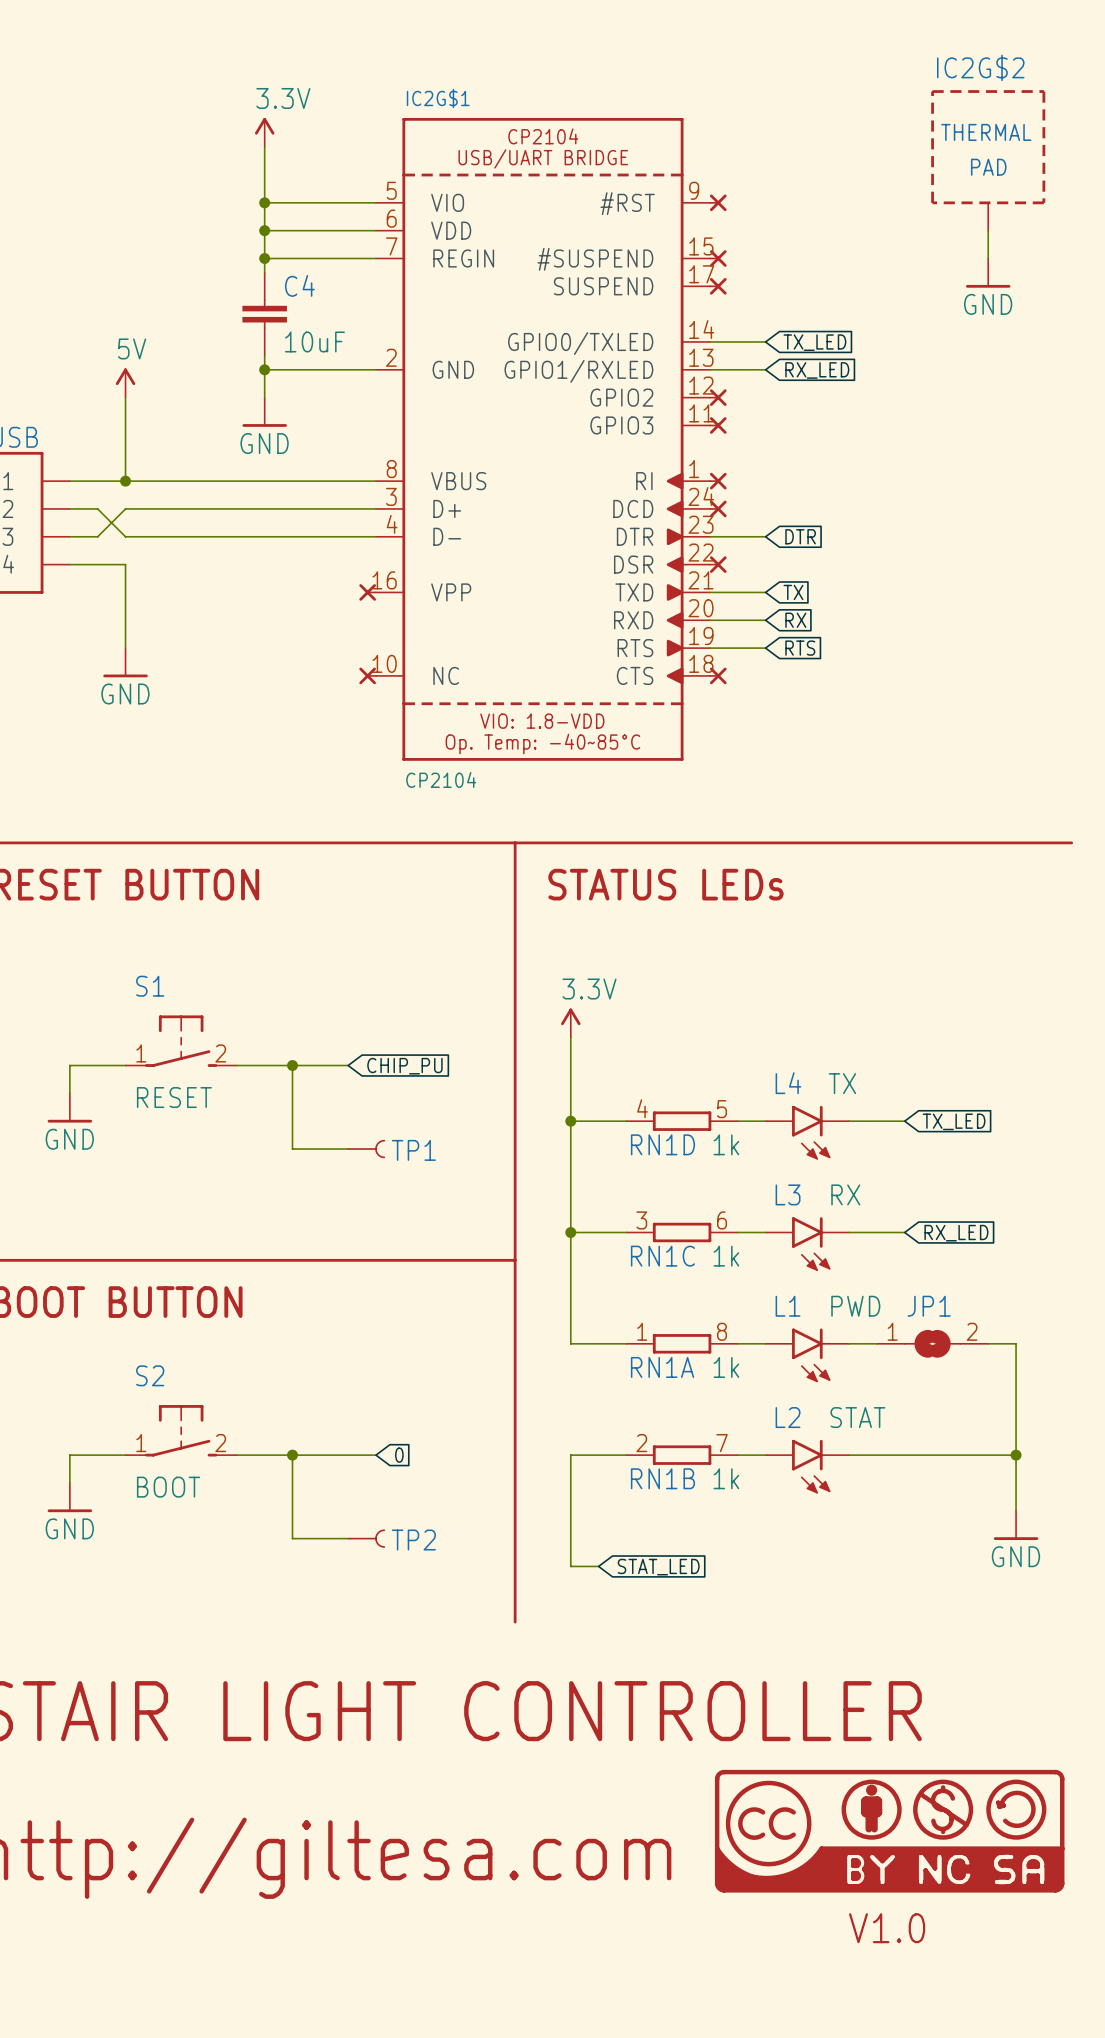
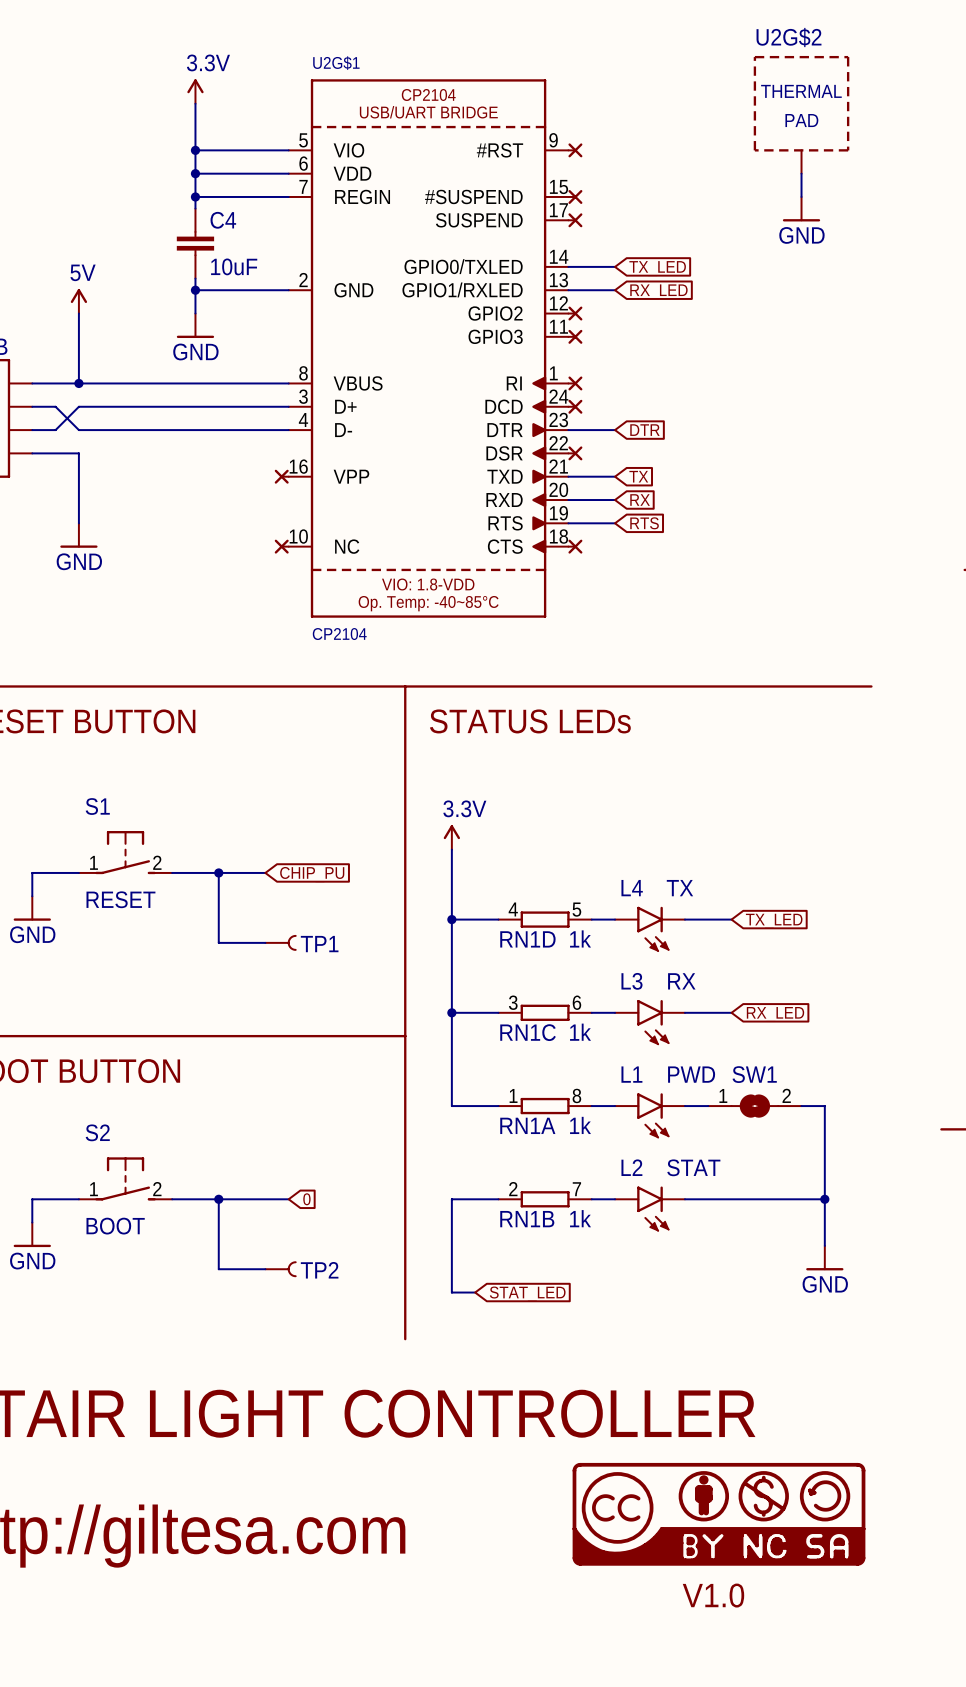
IC2G$2 name: IC2G$2 (980, 67) -> U2G$2 (789, 37)
IC2G$1 name: IC2G$1 (438, 98) -> U2G$1 (336, 63)
JP1 name: JP1 (929, 1306) -> SW1 (754, 1074)

